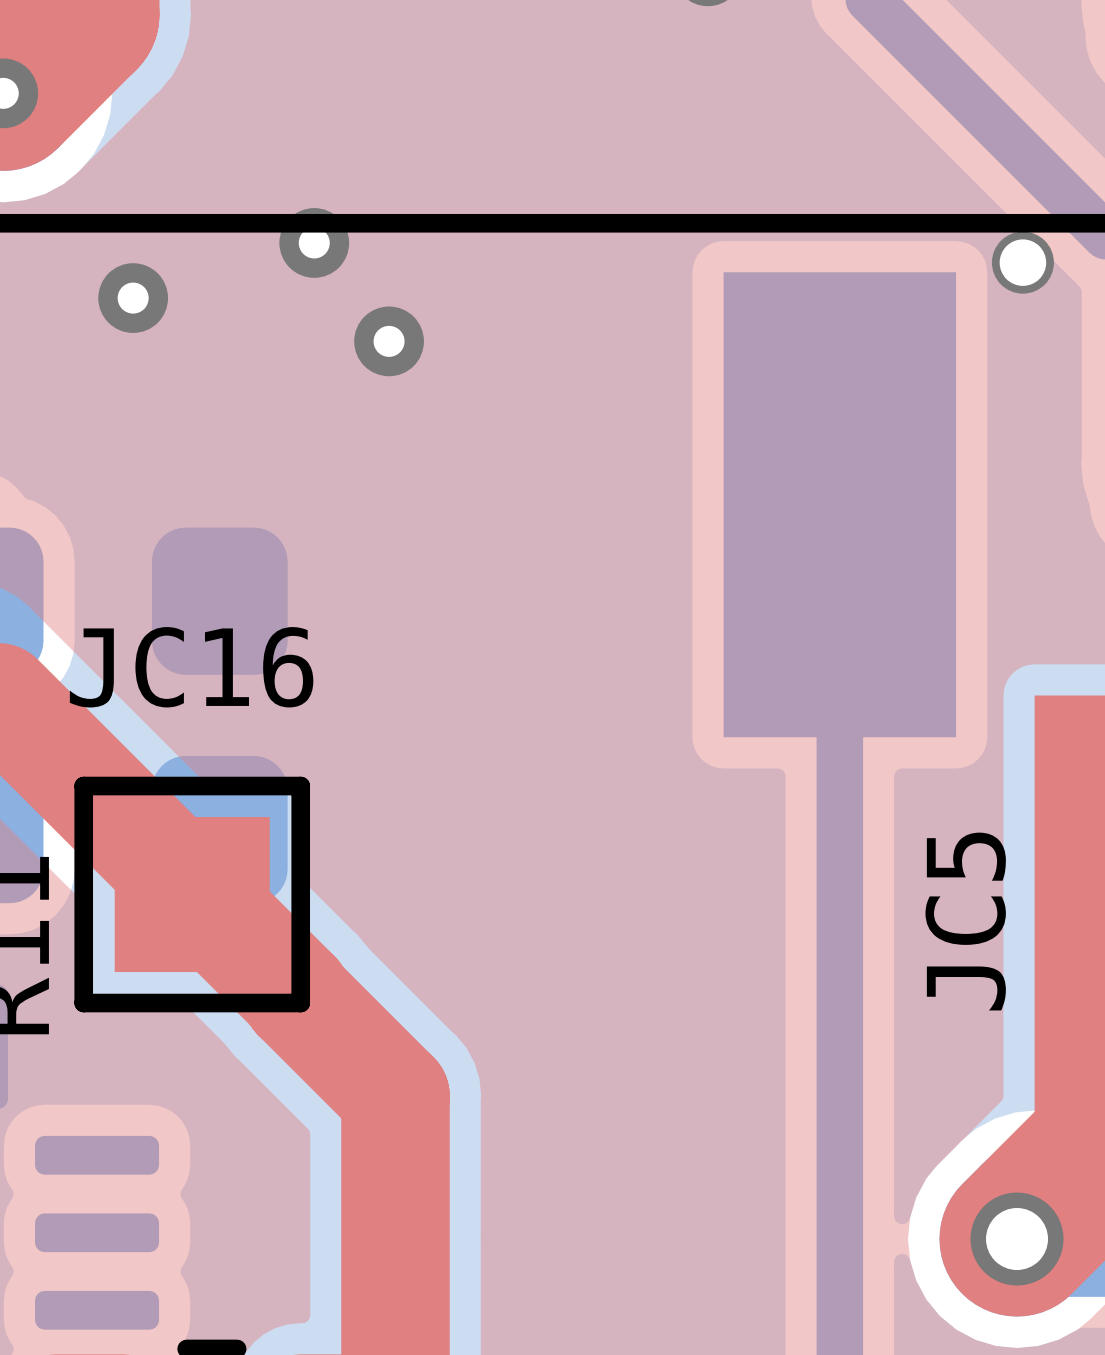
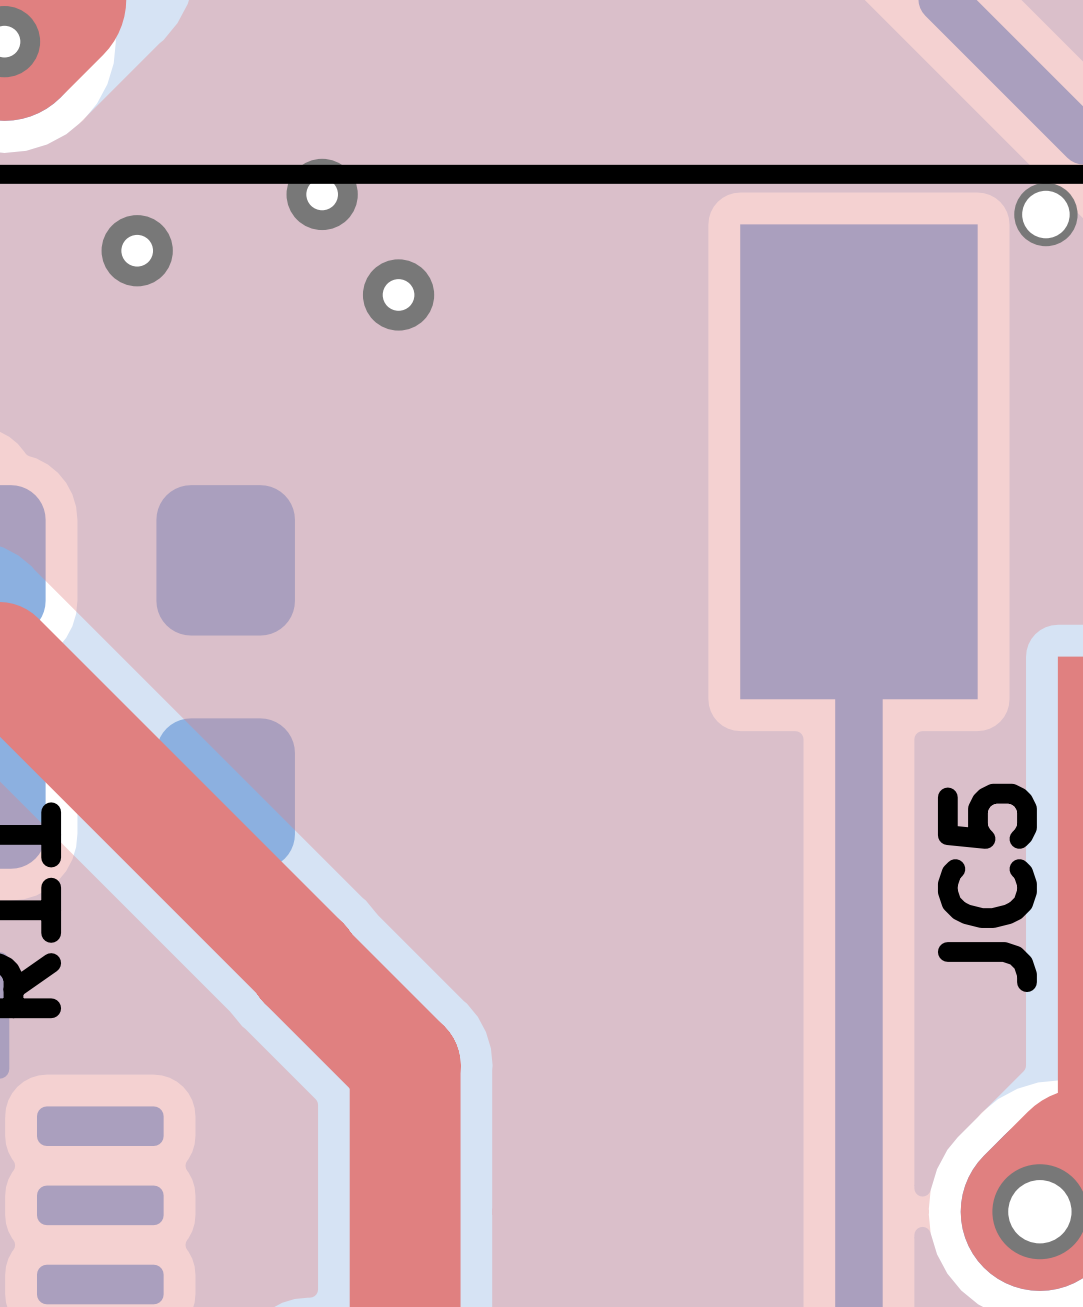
JC16: (192, 894) -> none

